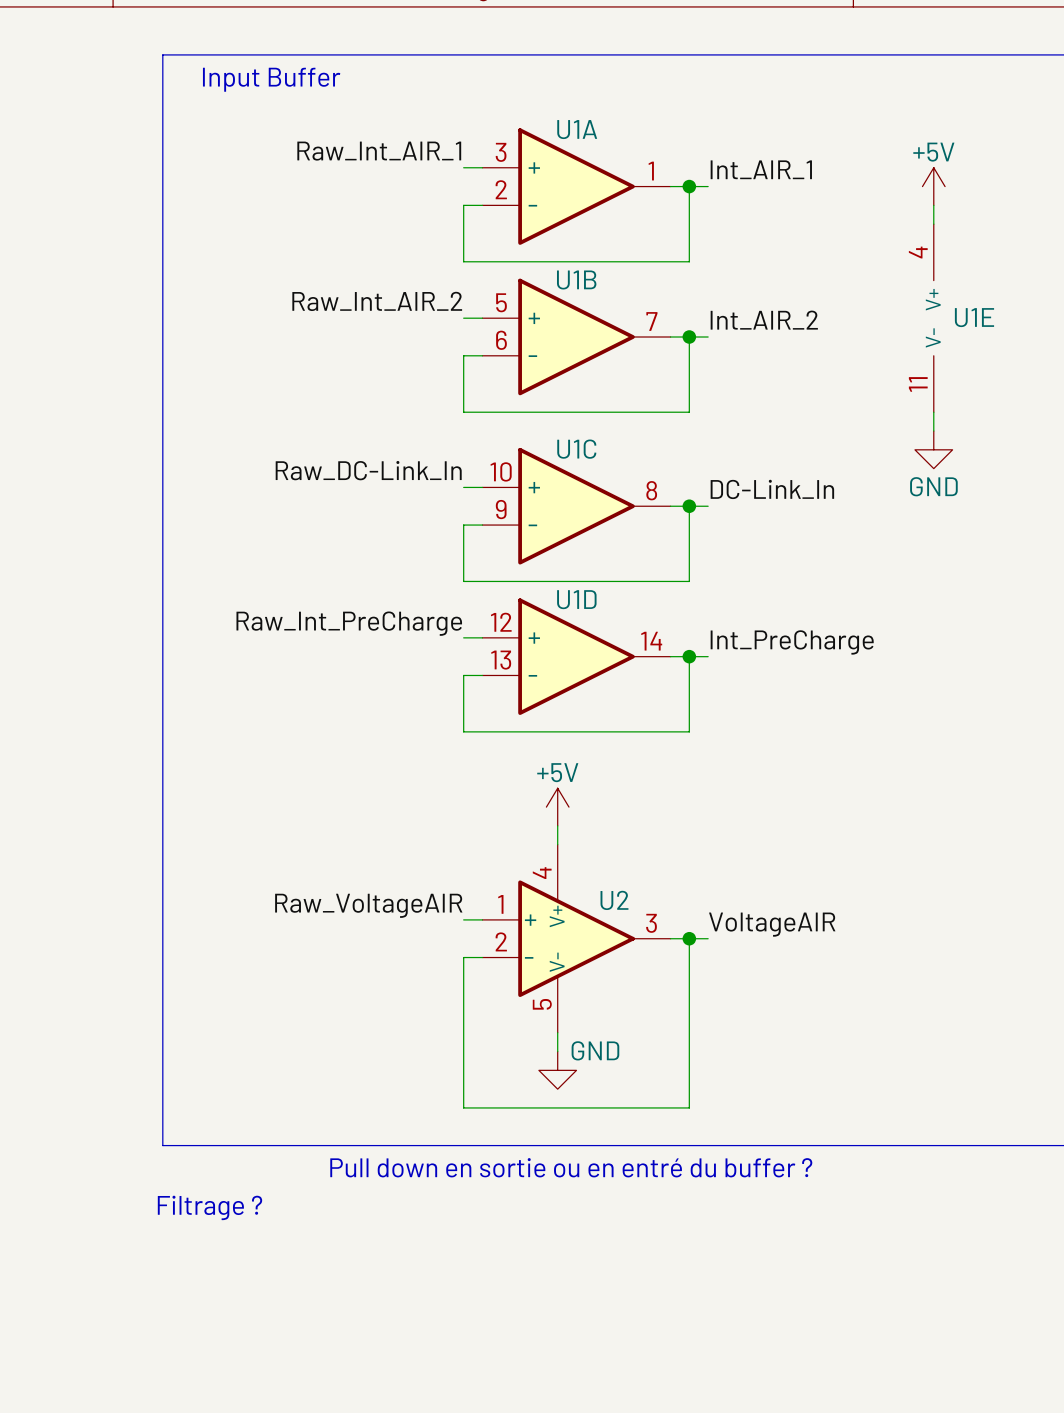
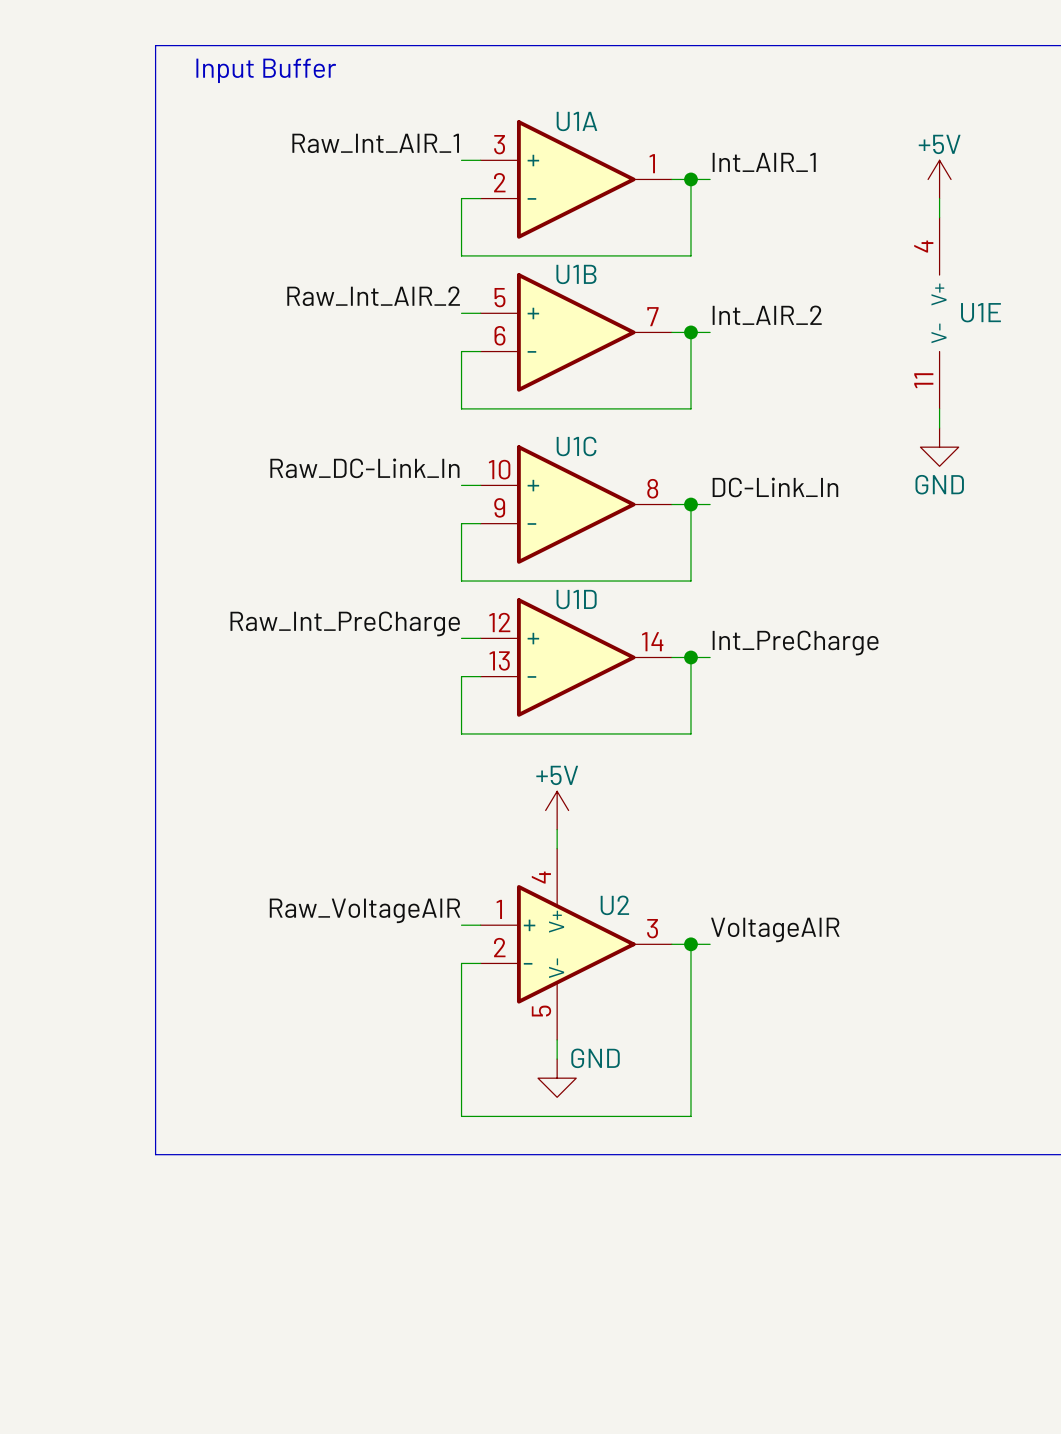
text: Pull down en sortie ou en entré du buffer ? (571, 1167) -> none
text: Filtrage ? (209, 1207) -> none

